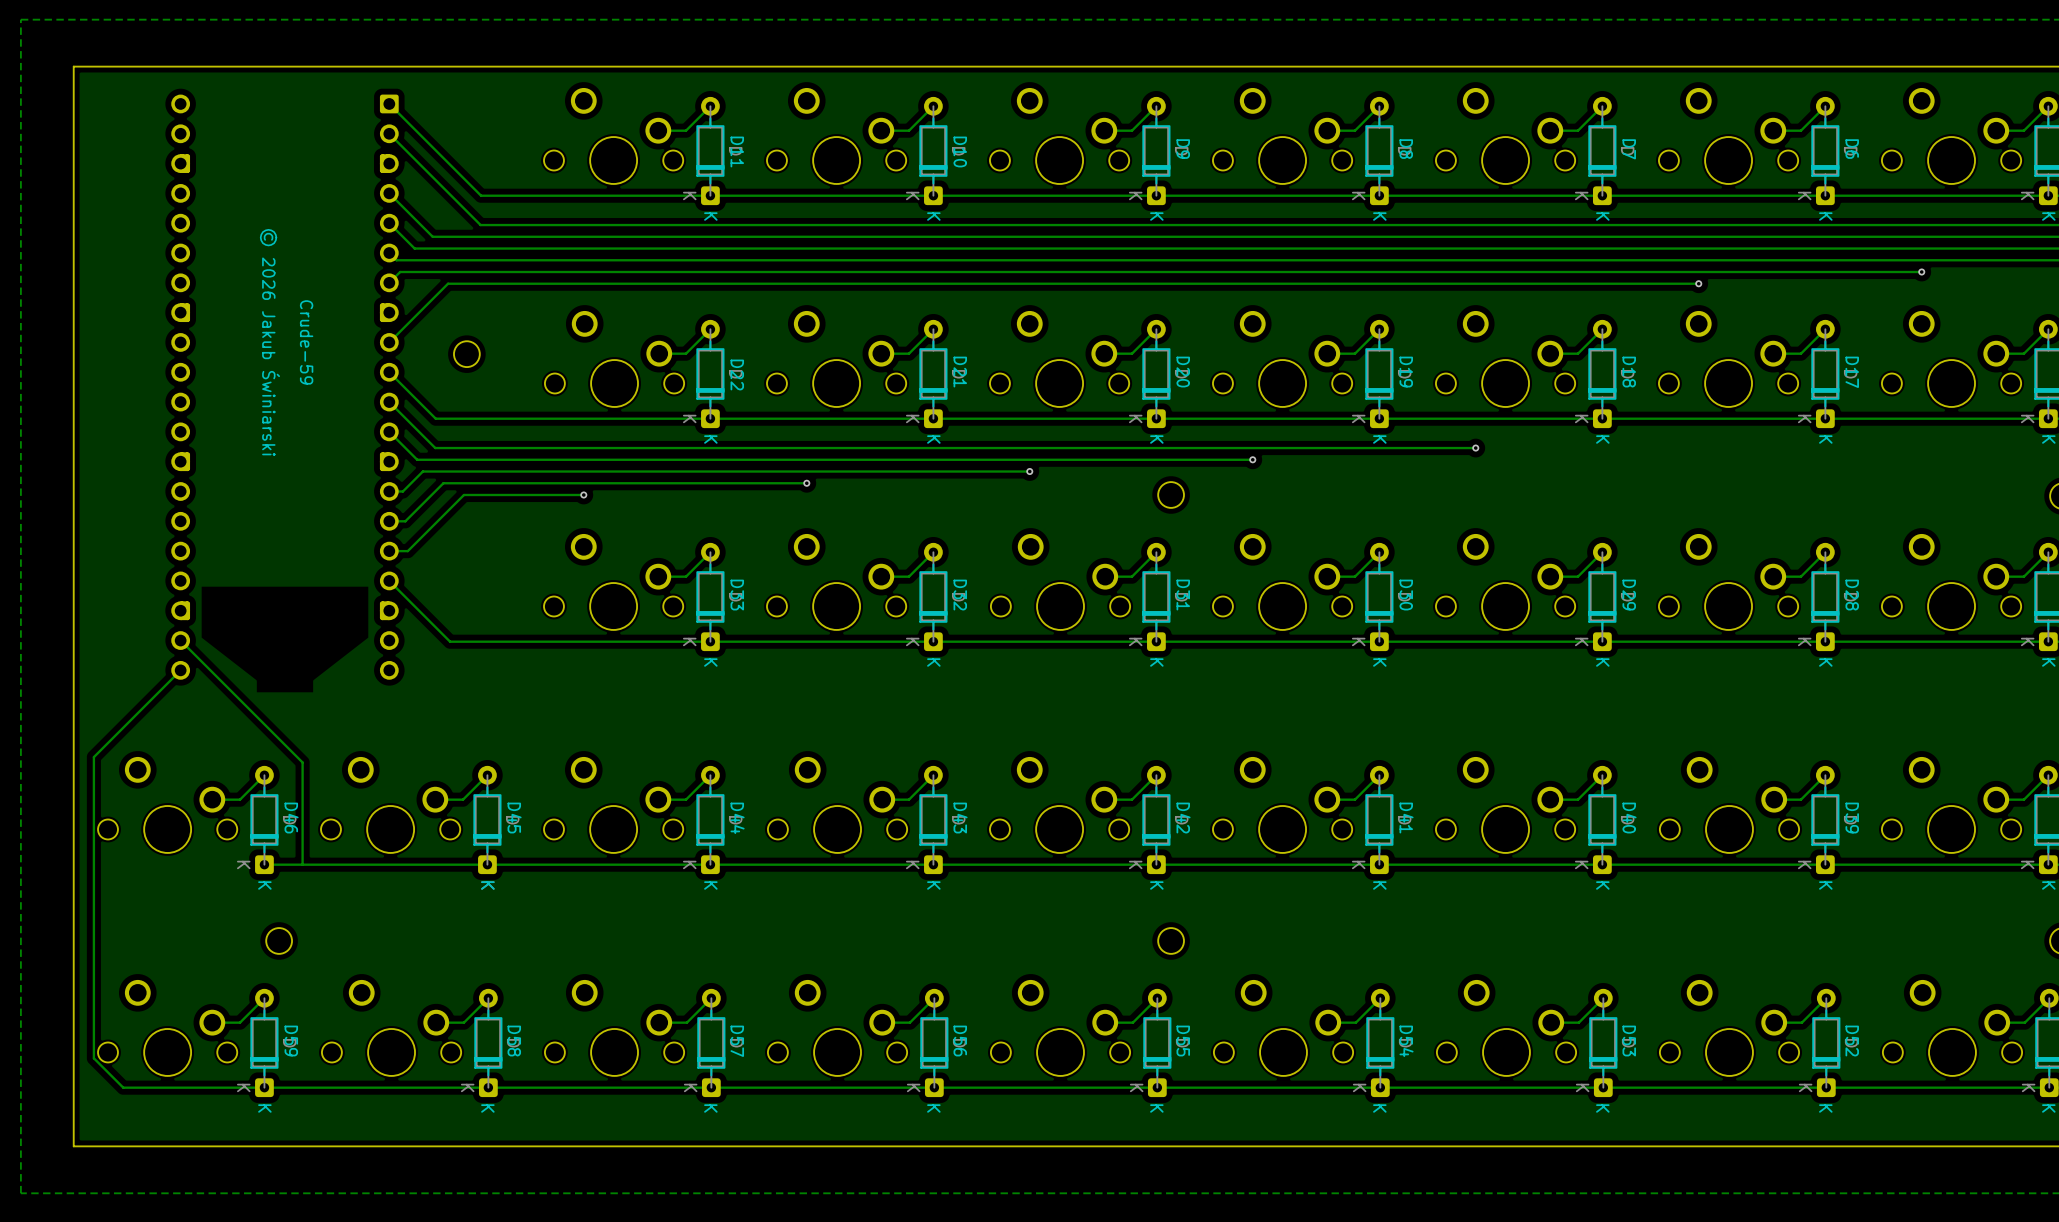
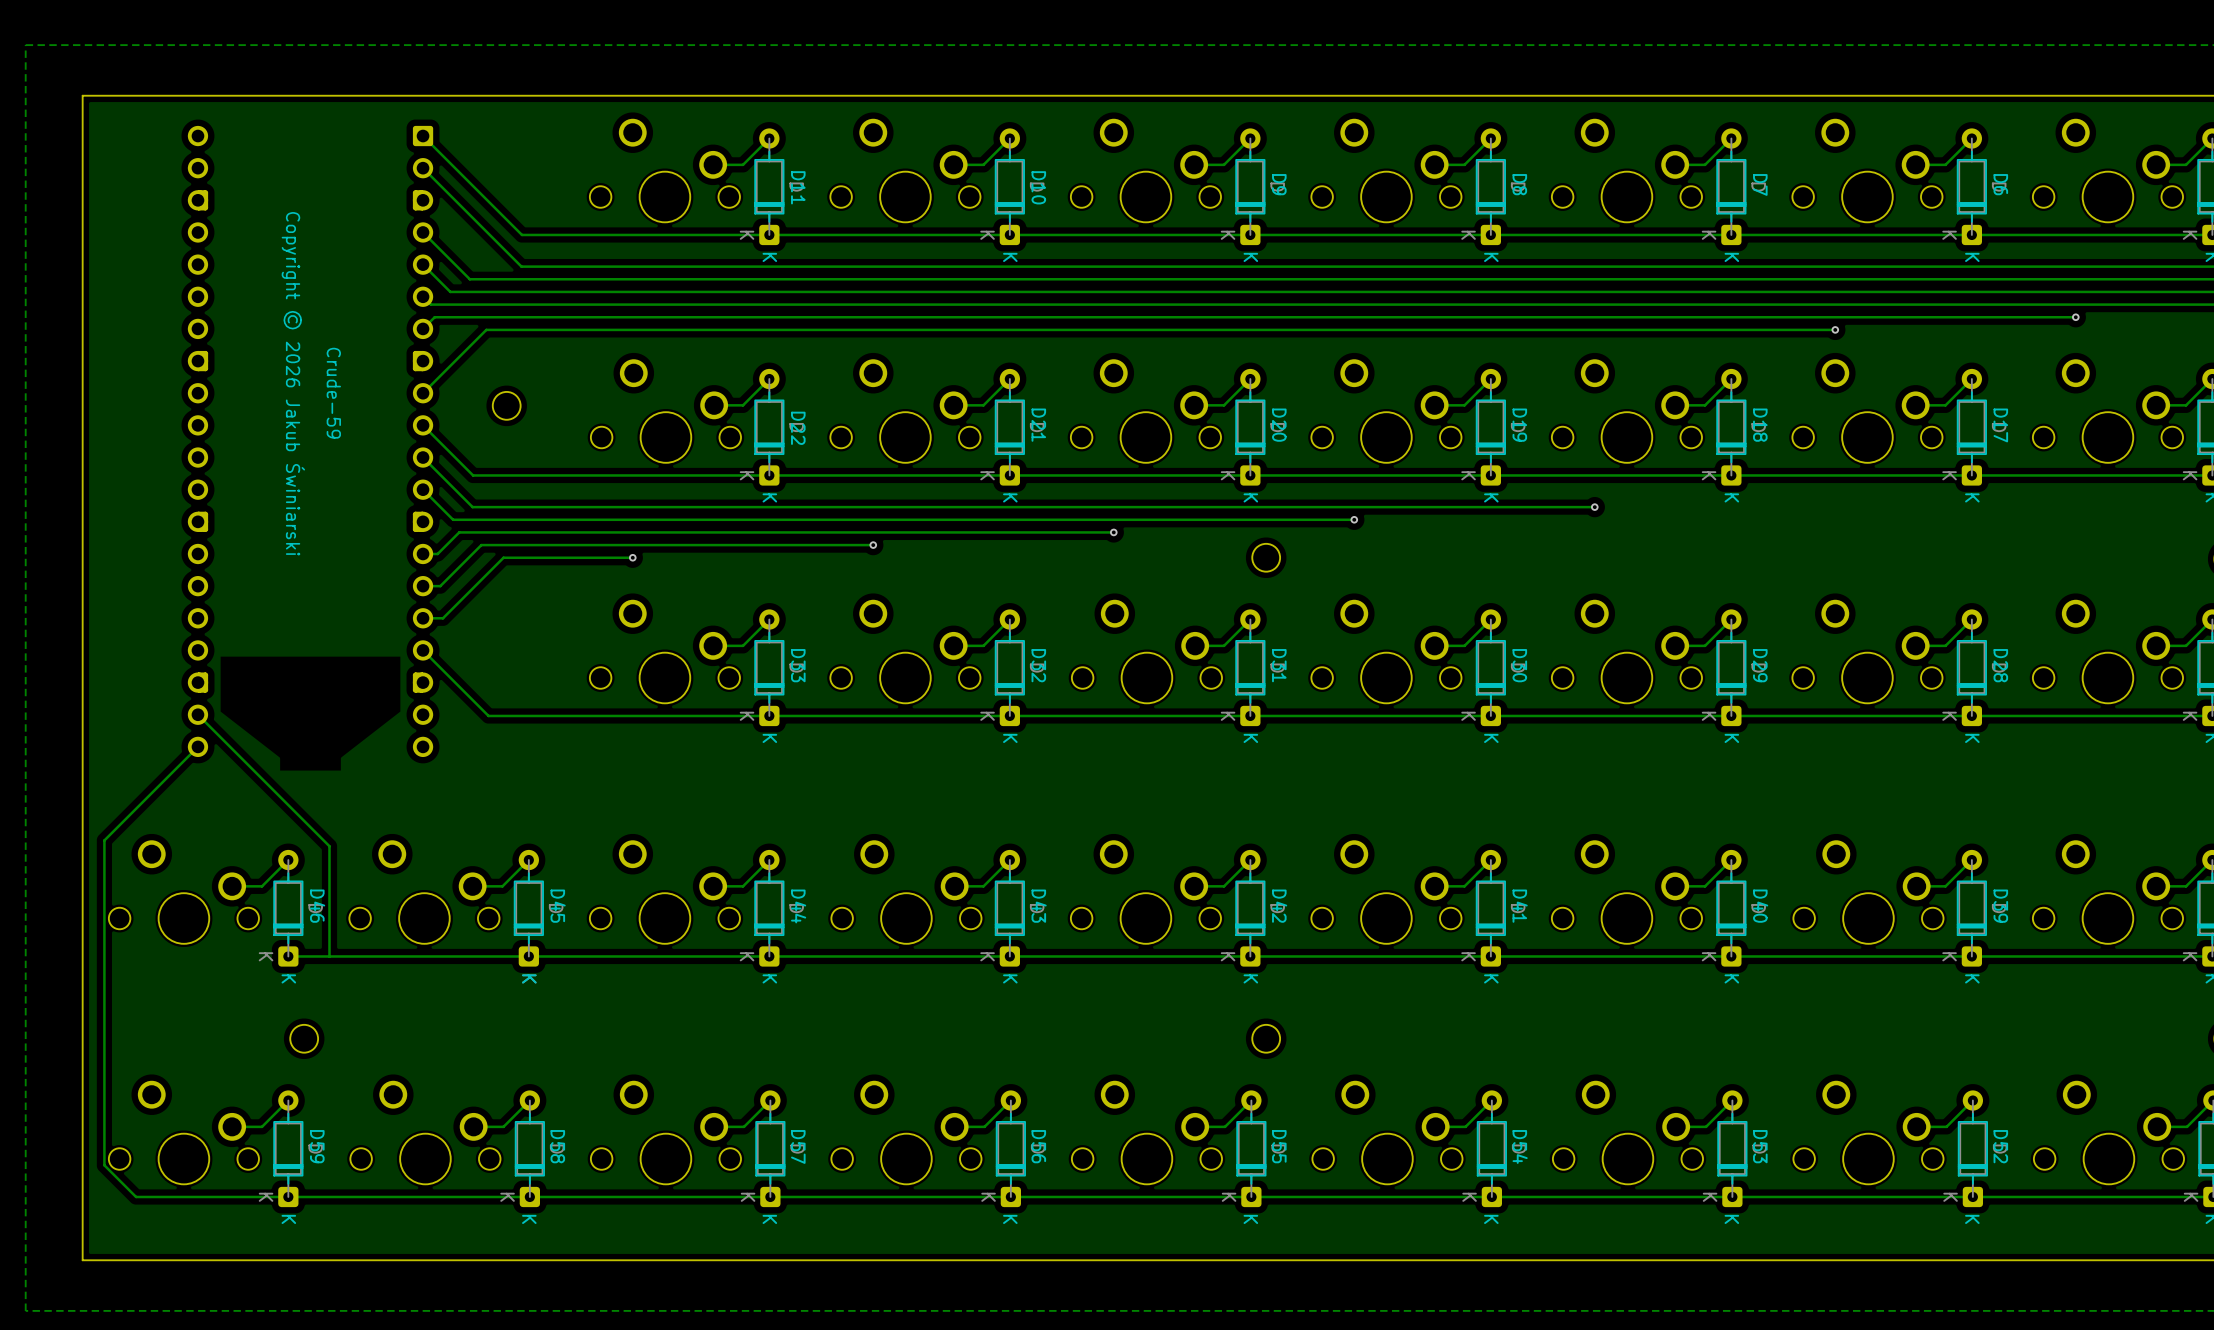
text: © 2026 Jakub Świniarski (269, 342) -> Copyright © 2026 Jakub Świniarski (293, 383)

